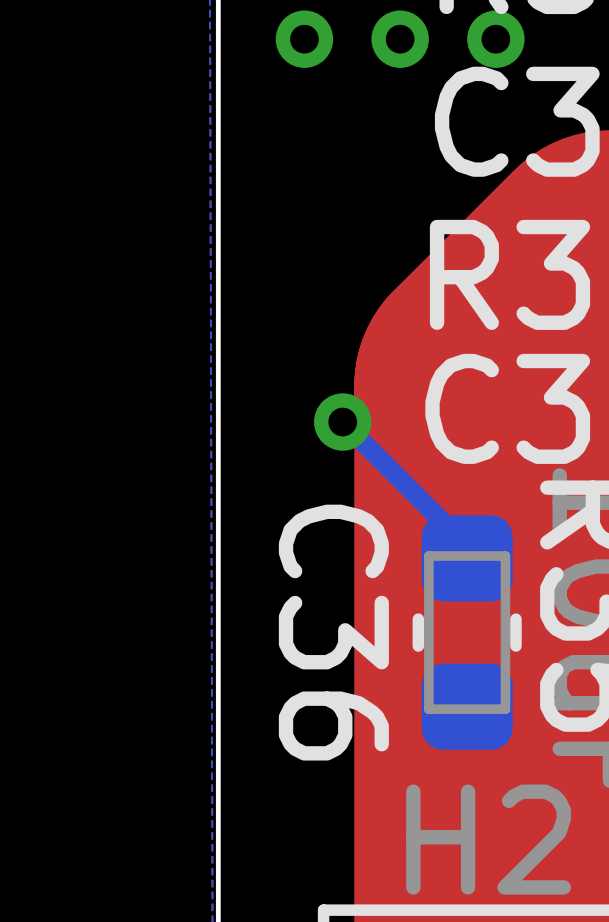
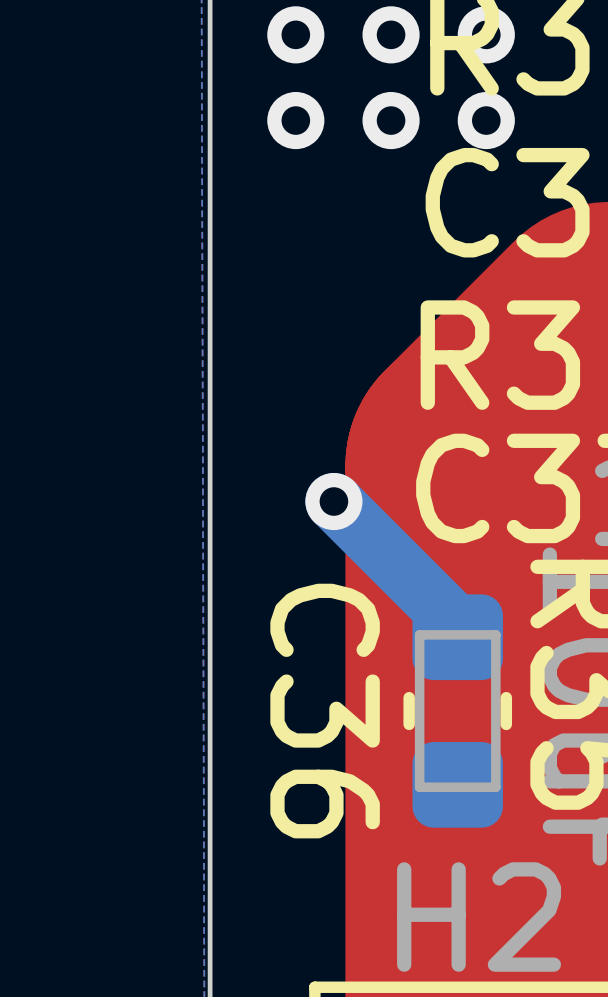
bottom track width: thin (342, 422) (467, 546) -> thick (333, 501) (457, 625)

